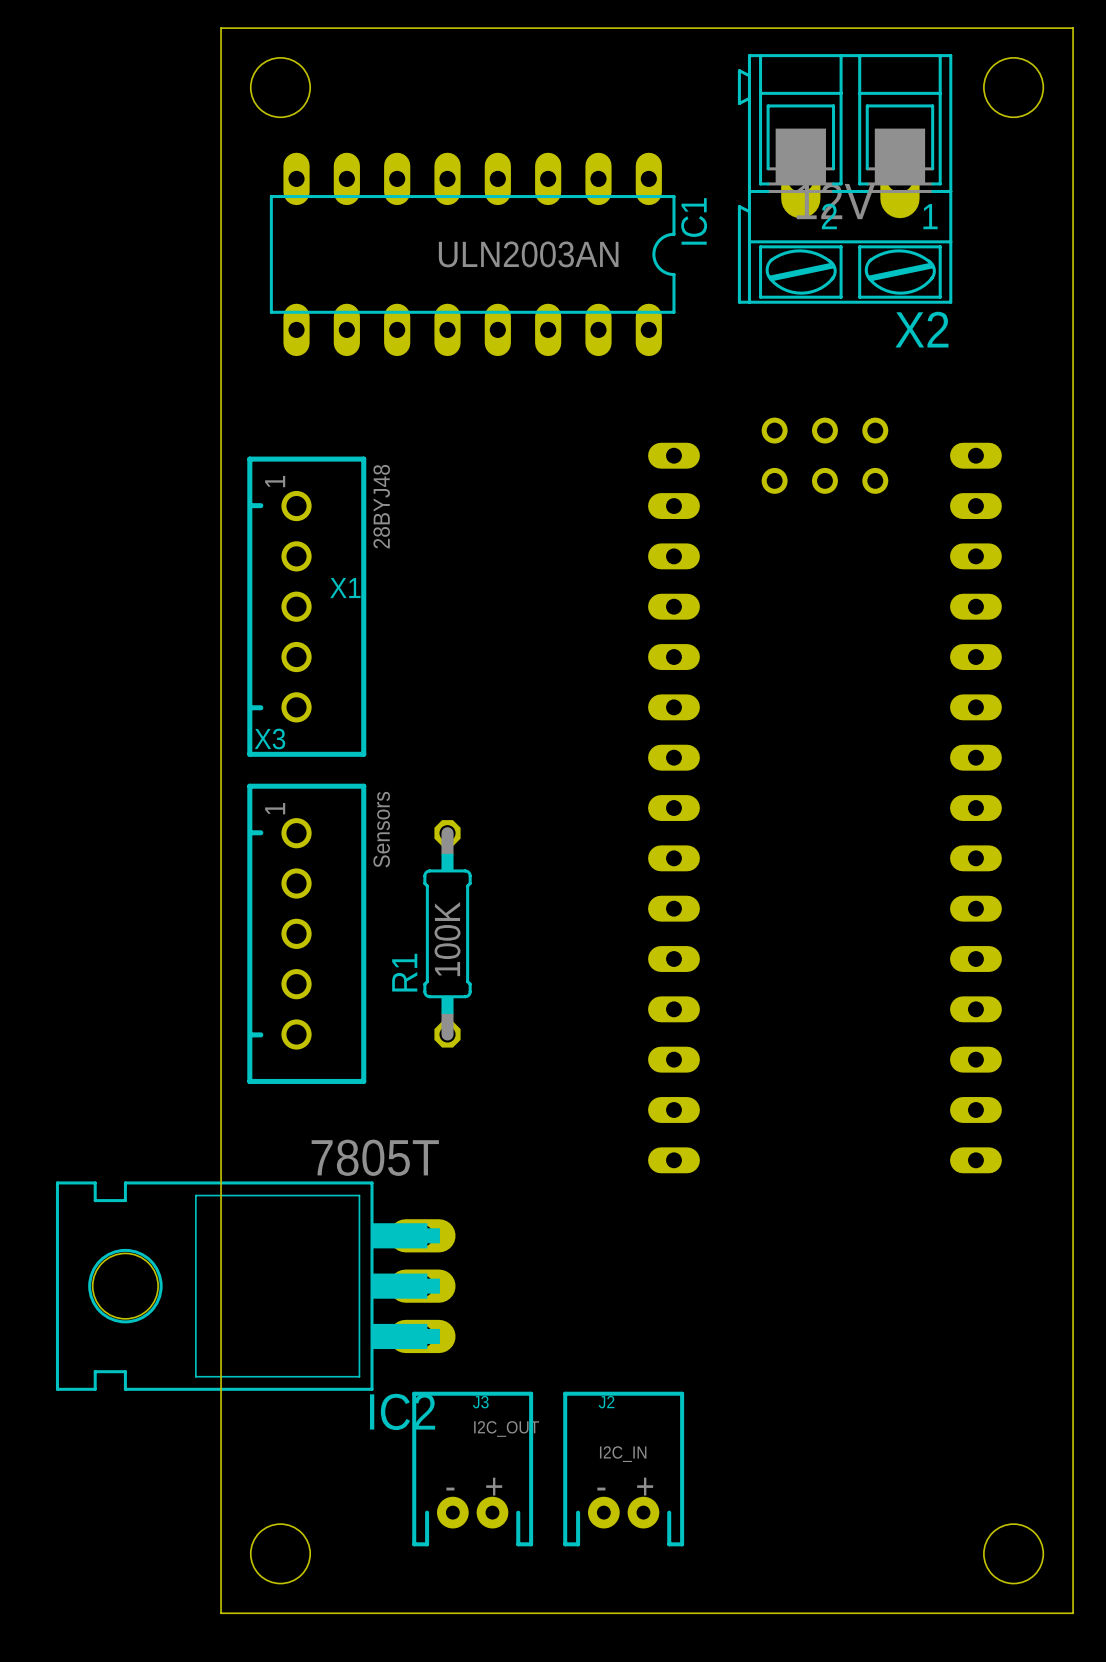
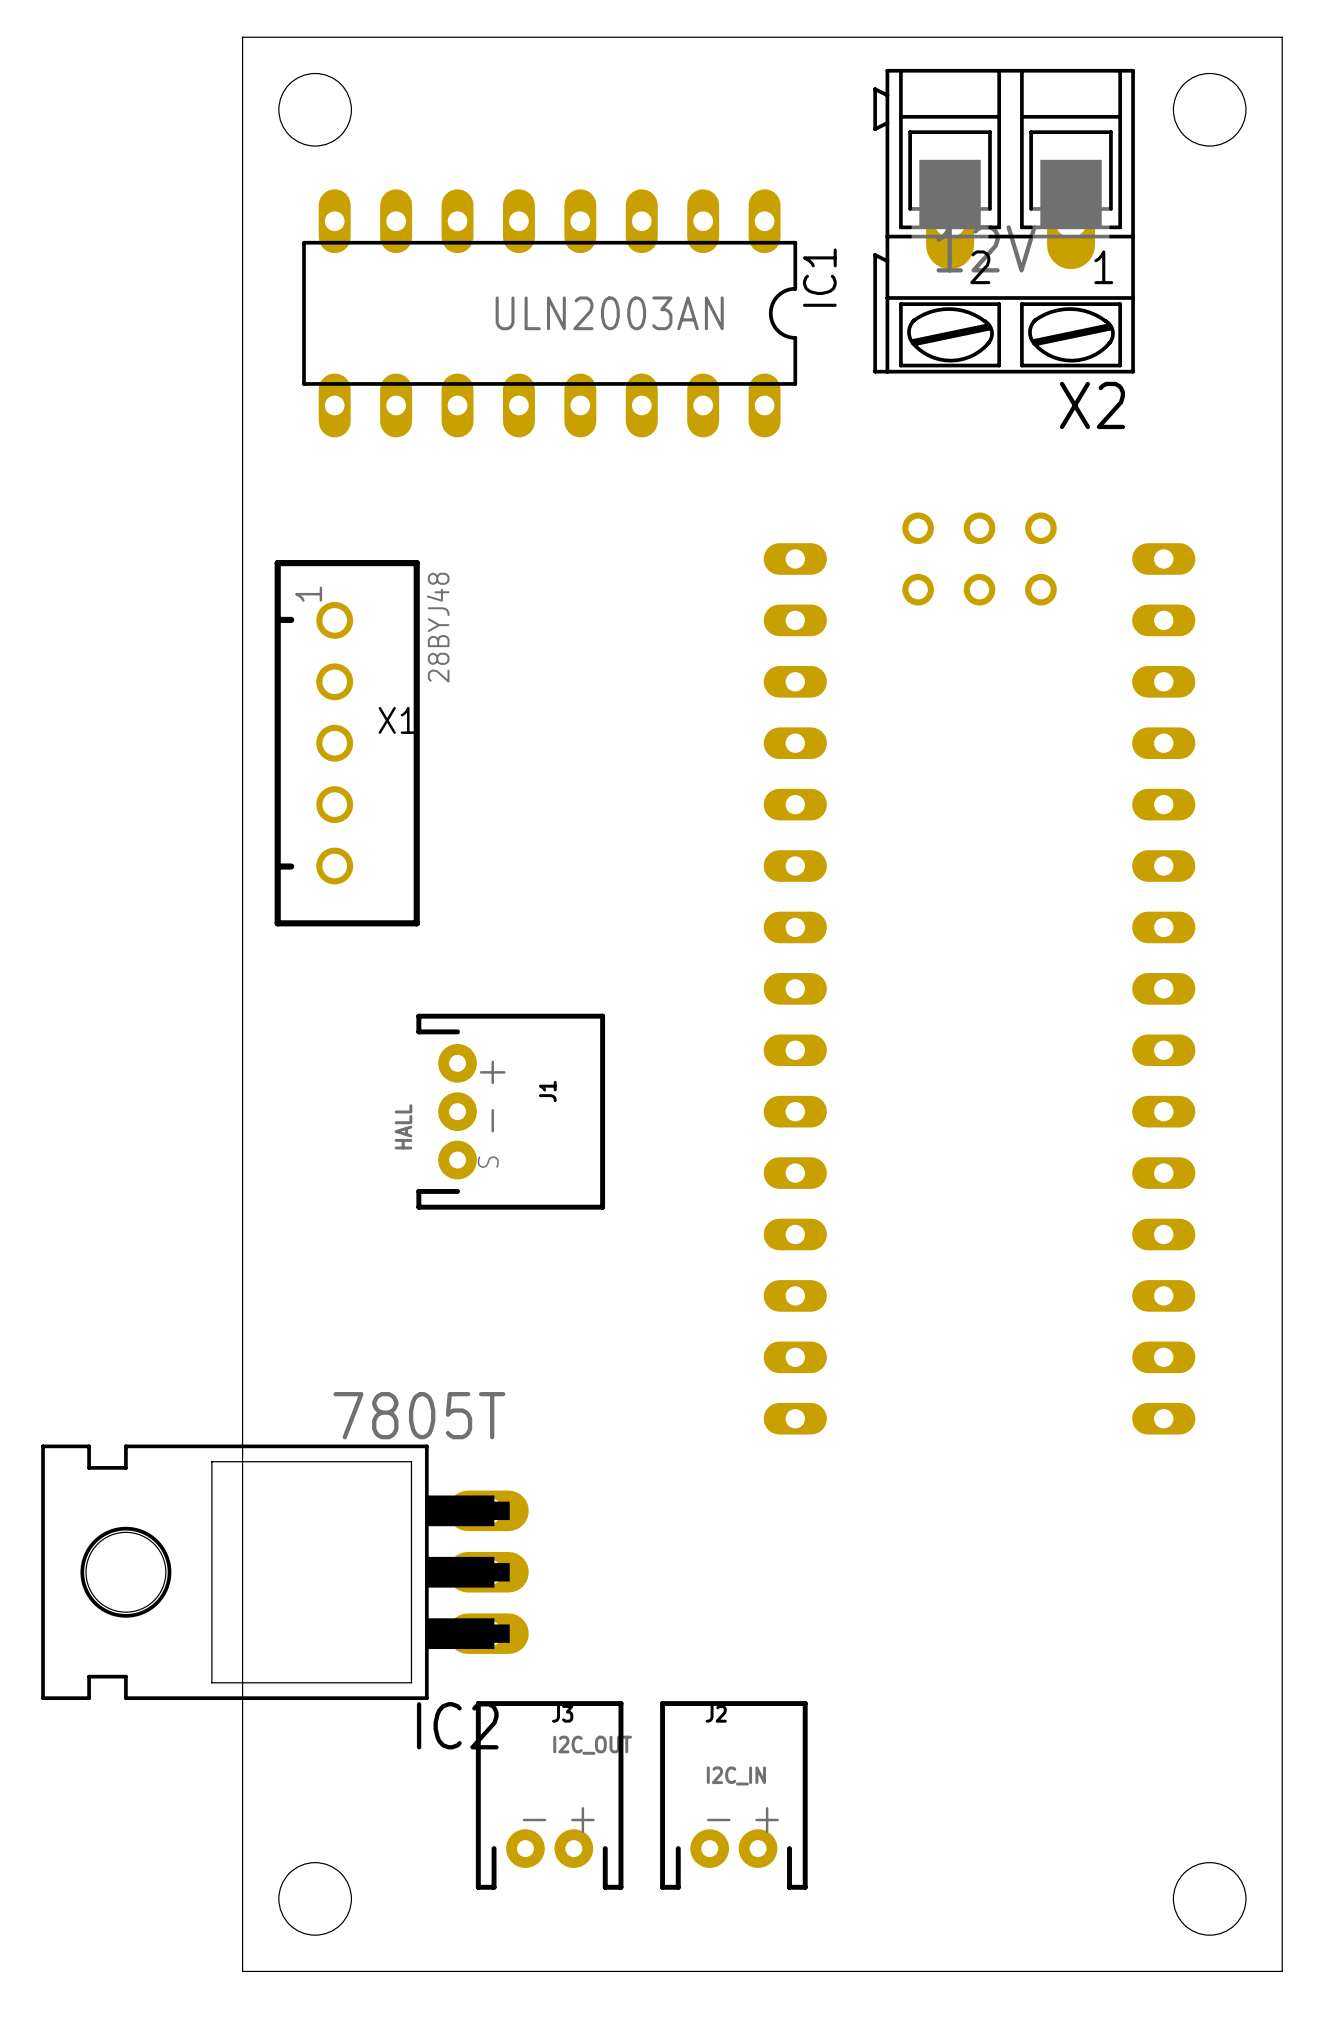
J1: none -> HALL (510, 1111)
X3: Sensors (306, 933) -> none
R1: 100K (447, 933) -> none

